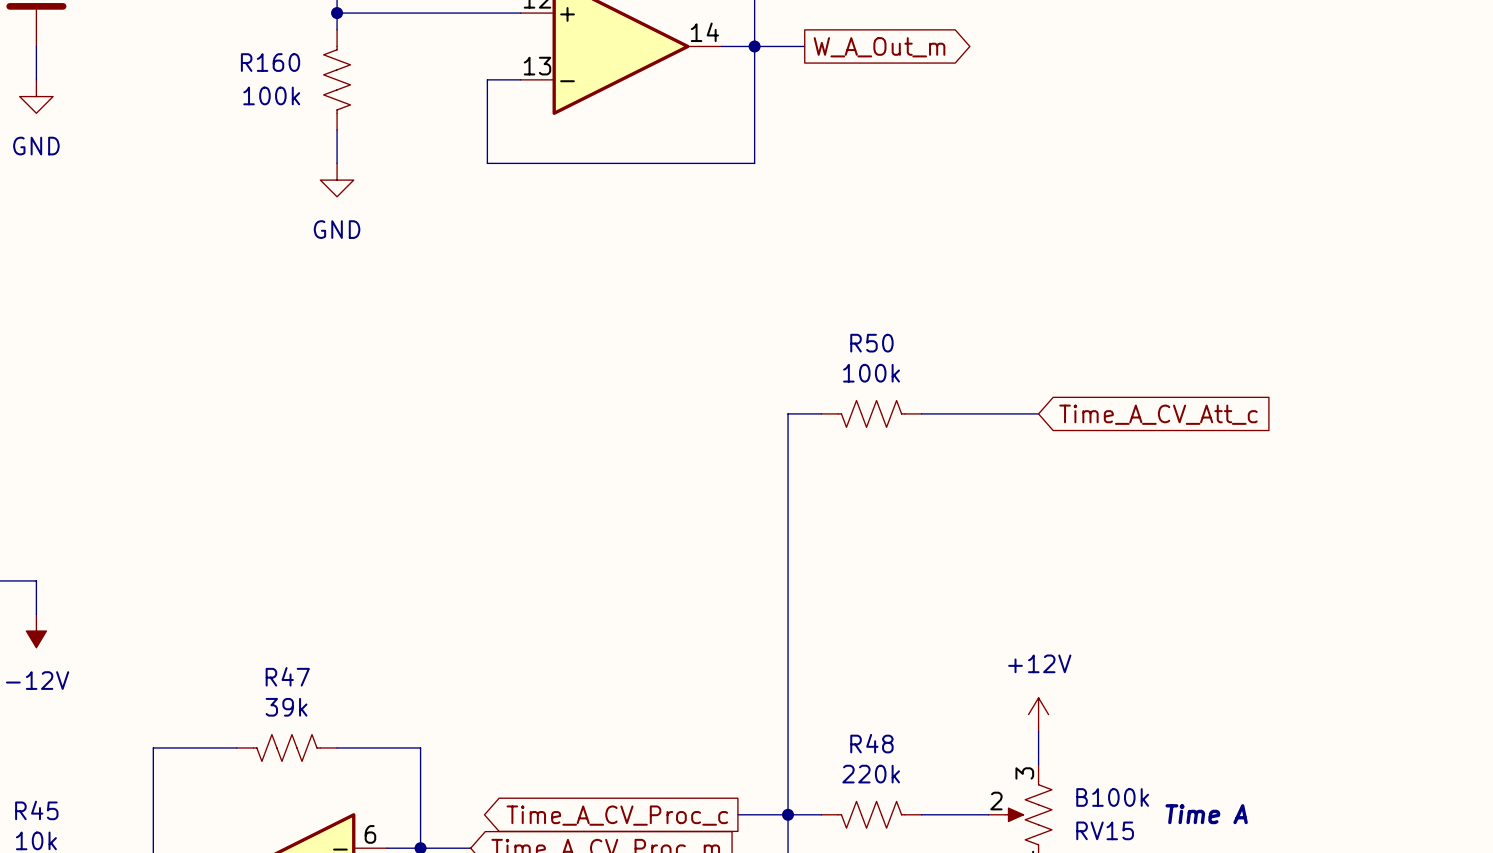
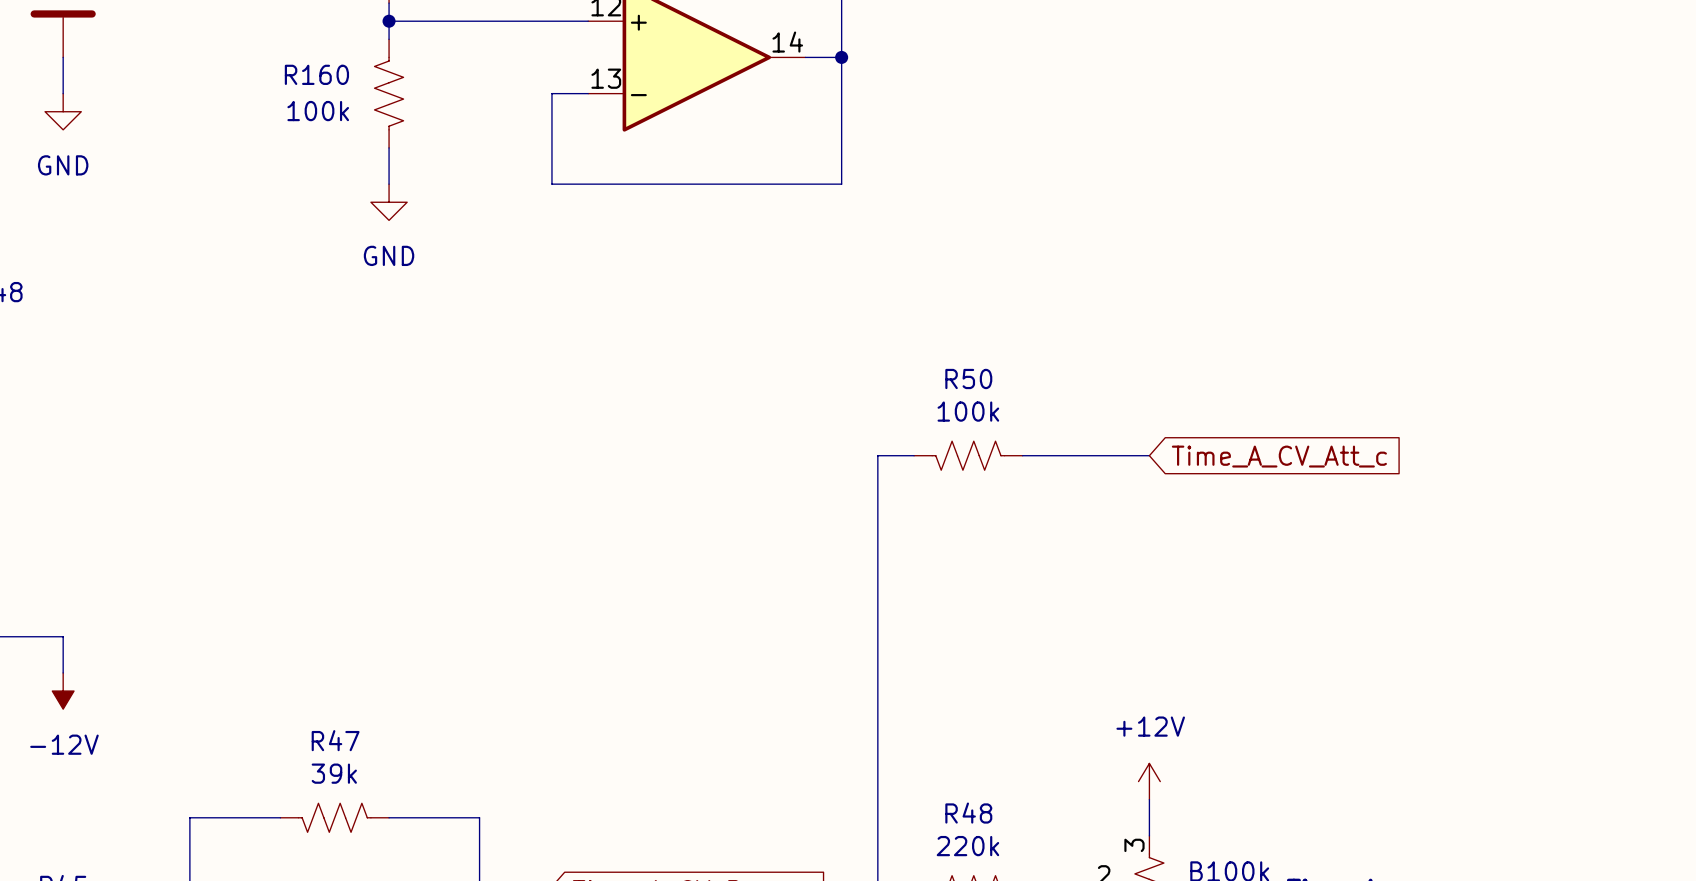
wire: (754, 46) (804, 46) -> none
global label: W_A_Out_m (879, 47) -> none

